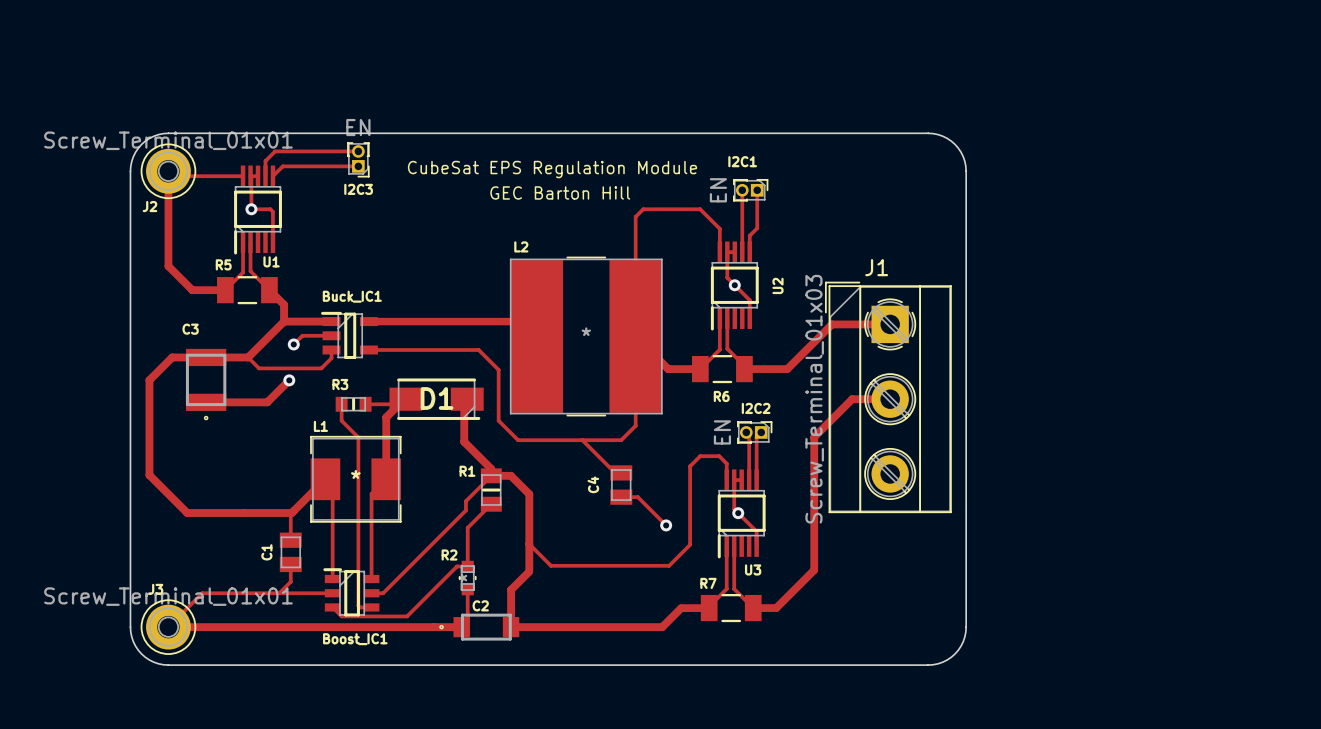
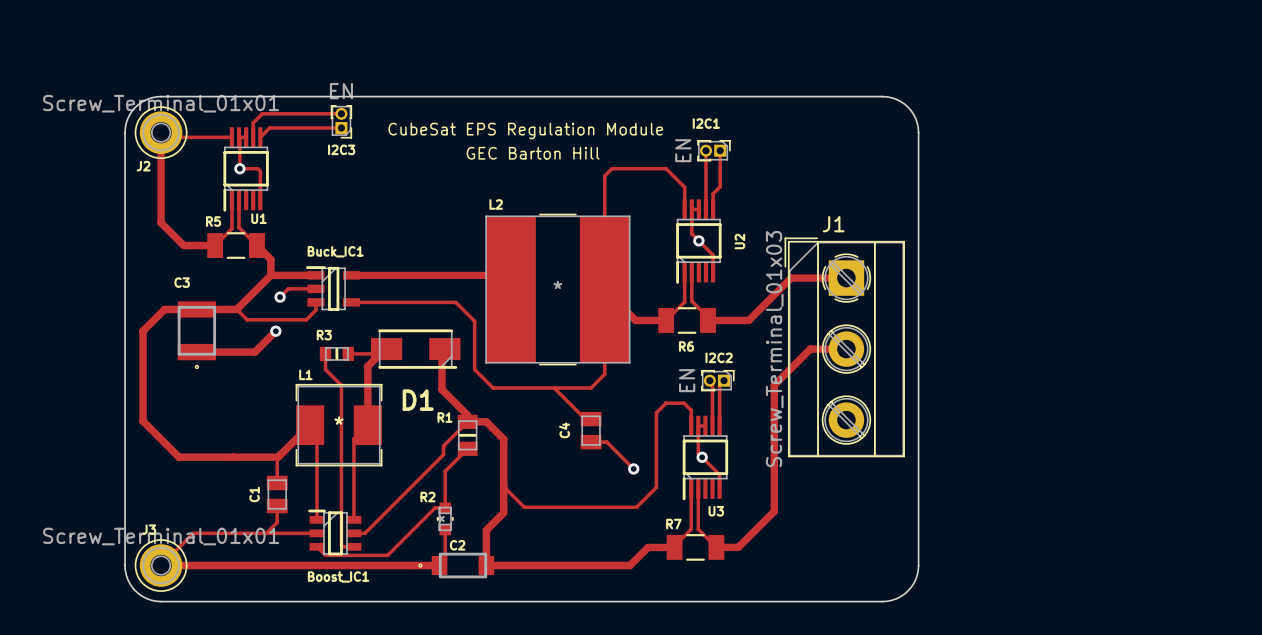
D1 name position: D1 (437, 398) -> D1 (418, 400)

